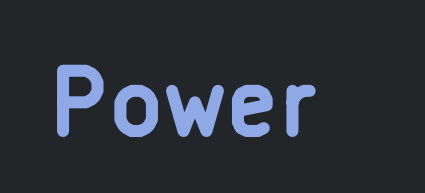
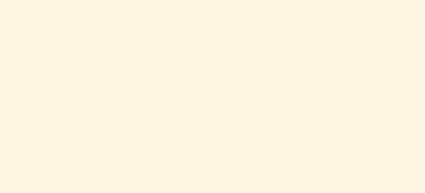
text: Power (186, 100) -> none

